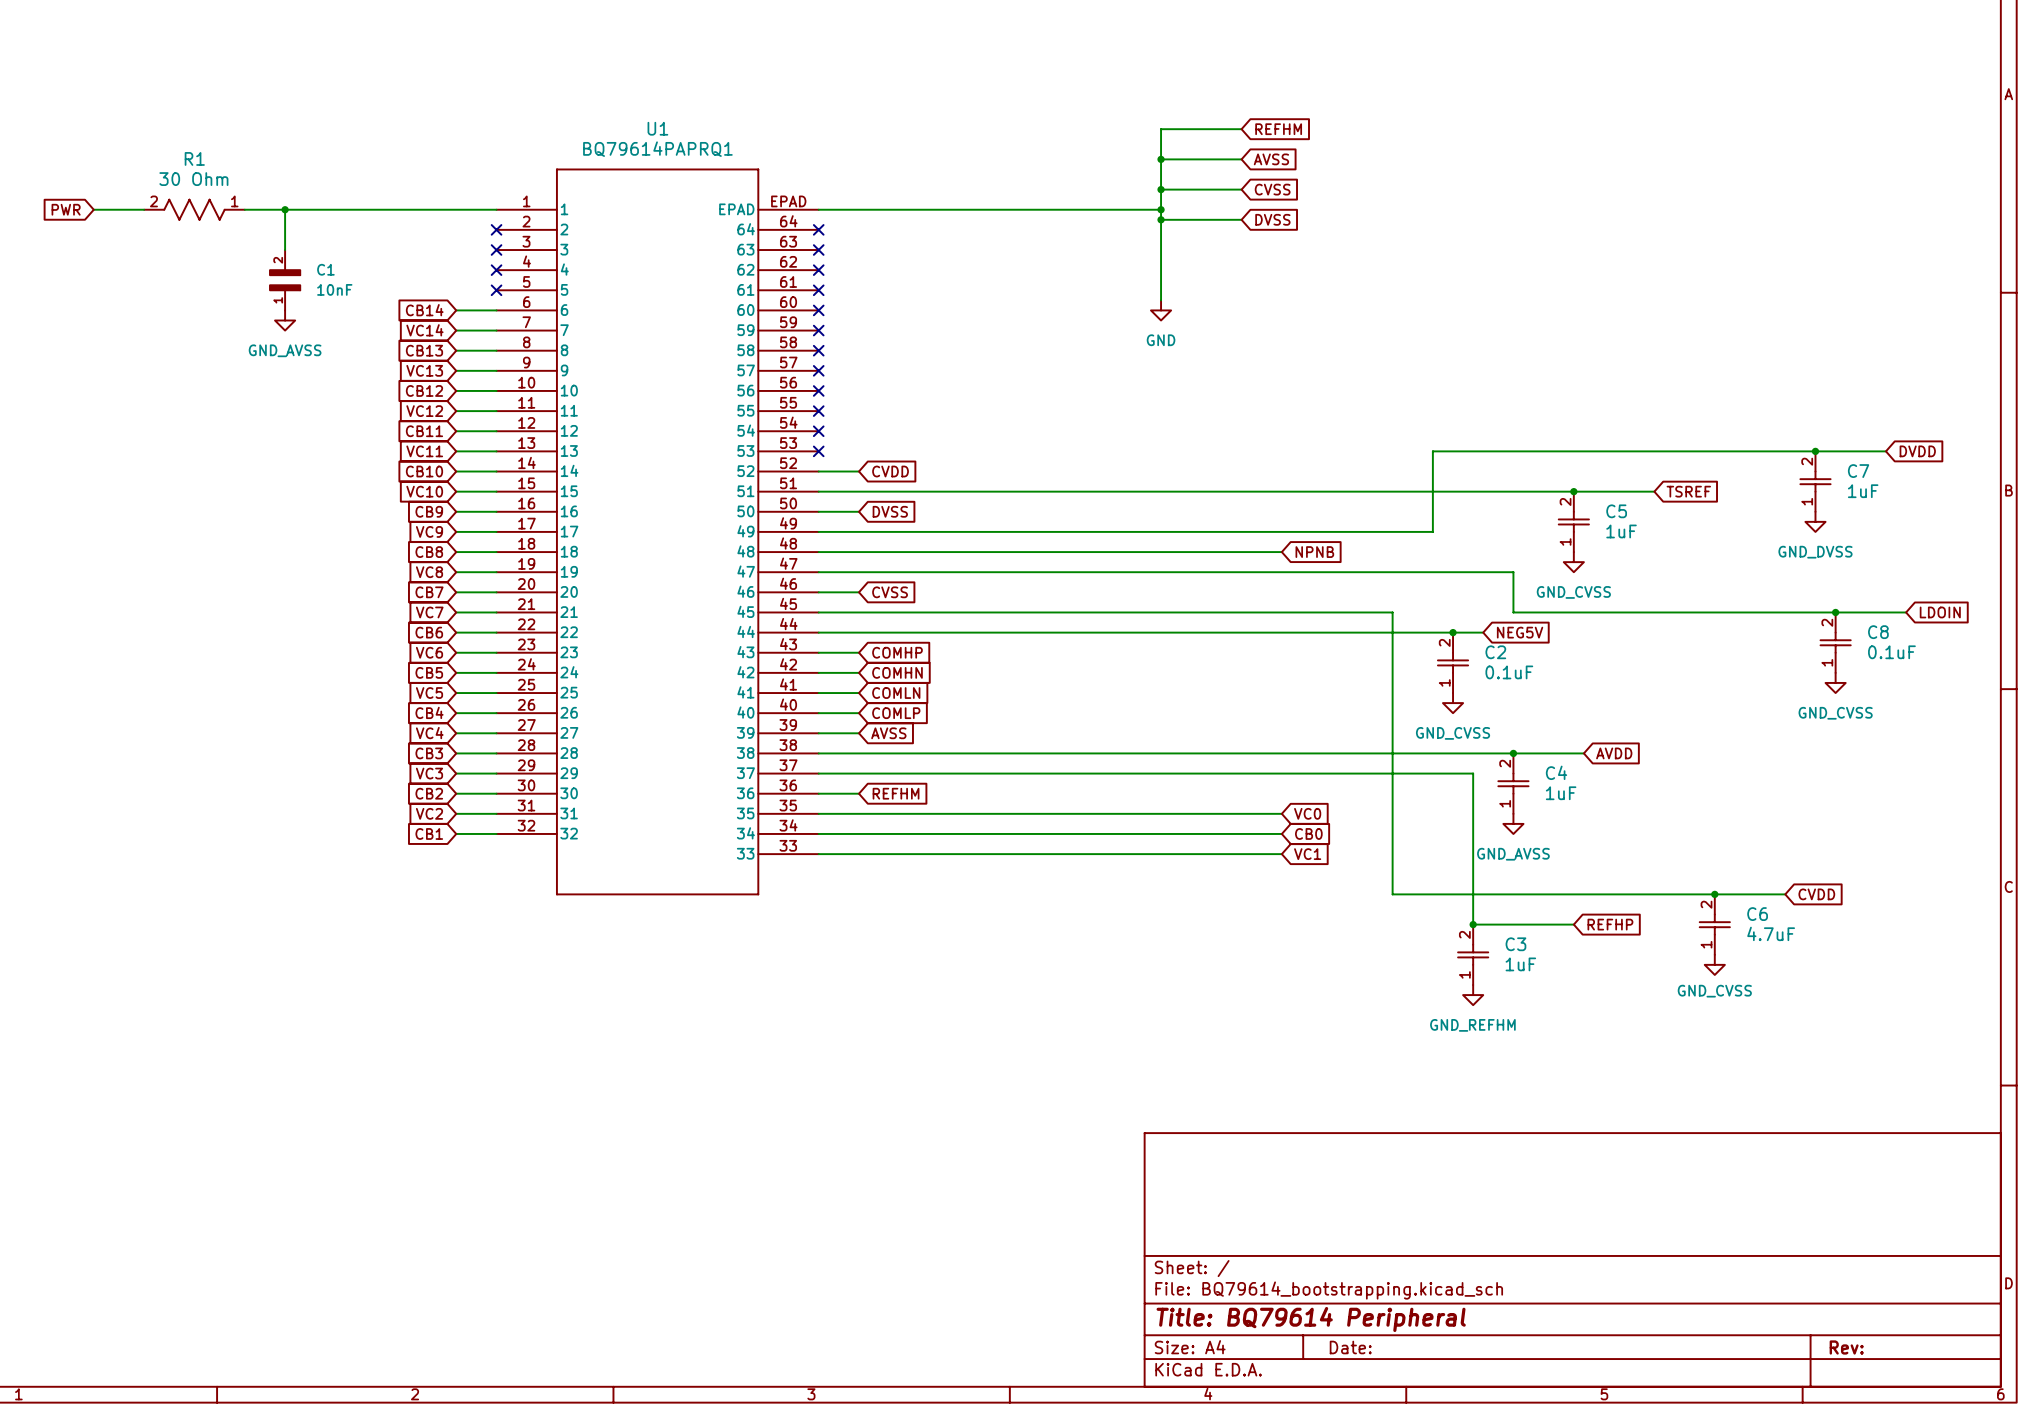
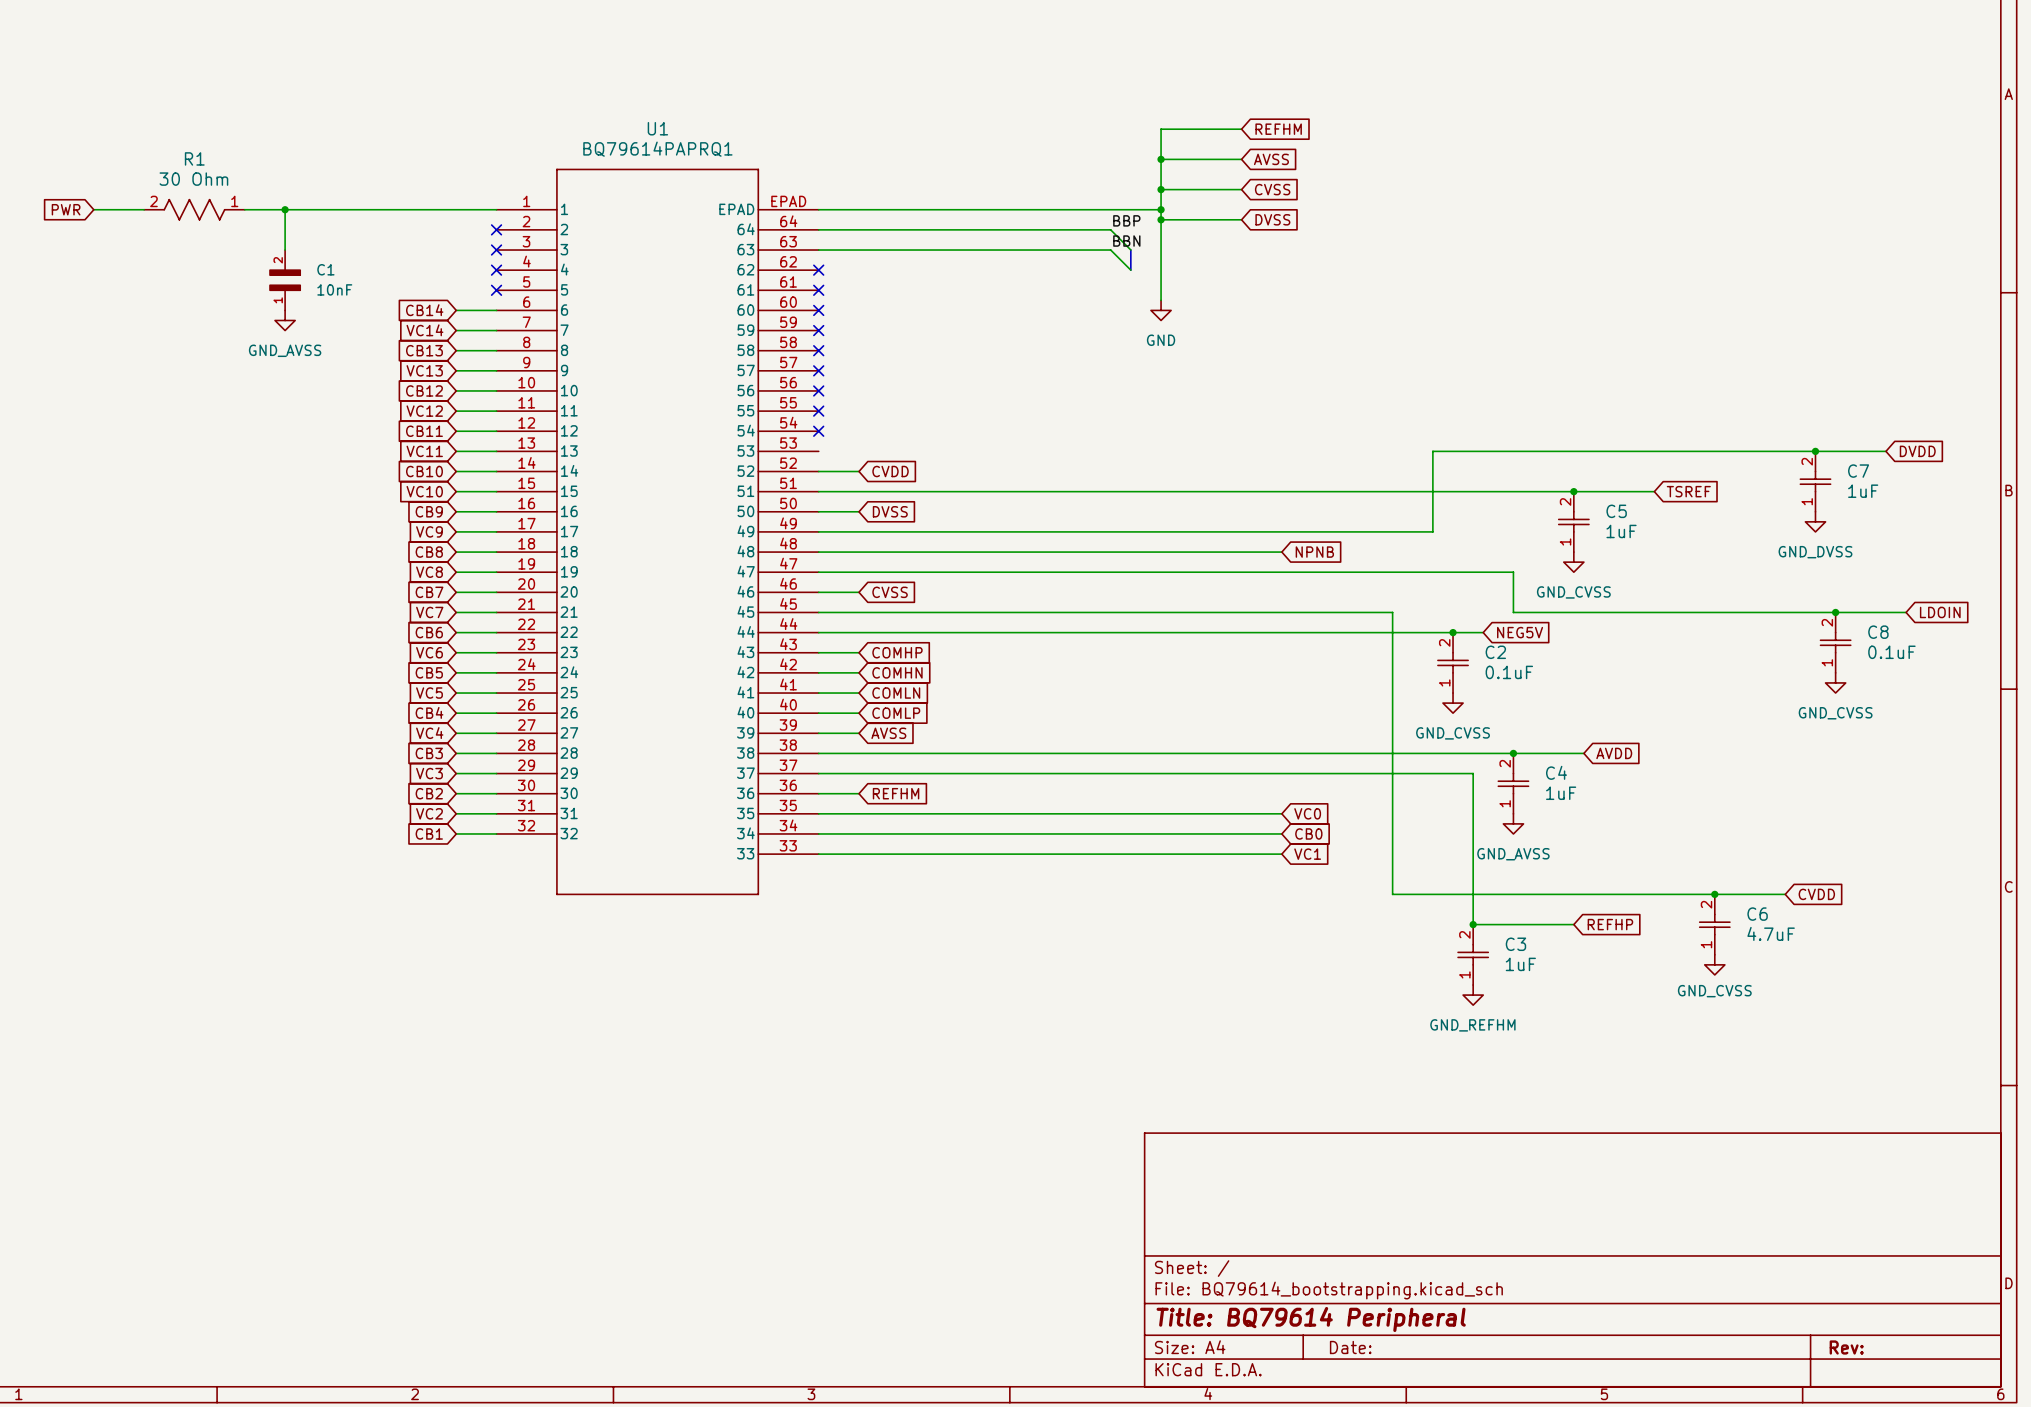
label: none -> BBP (1126, 220)
wire: none -> (818, 229) (1110, 229) (1130, 250)
no-connect mark: (818, 229) -> none
label: none -> BBN (1126, 241)
wire: none -> (818, 250) (1110, 250) (1130, 270)
no-connect mark: (818, 250) -> none
bus: none -> (1130, 250) (1130, 270)
no-connect mark: (818, 451) -> none

